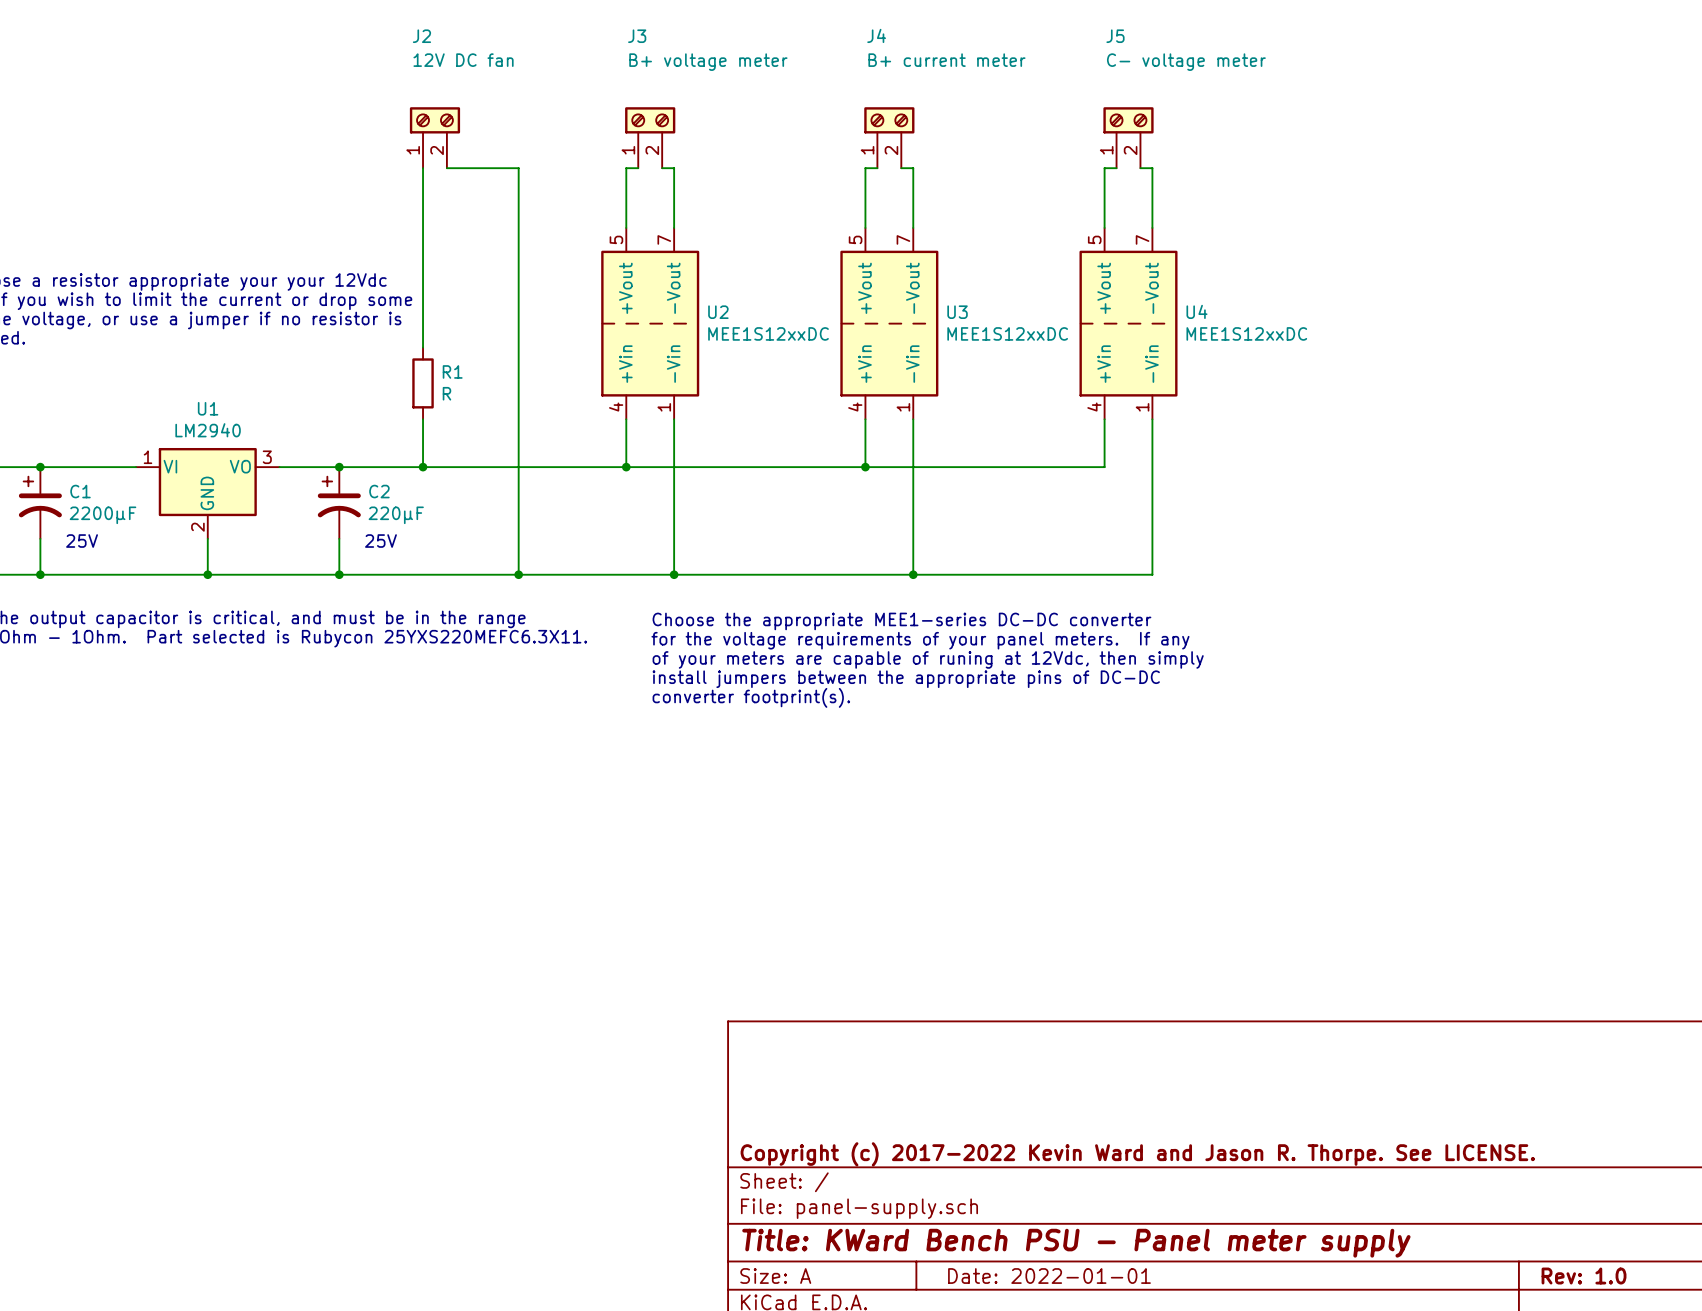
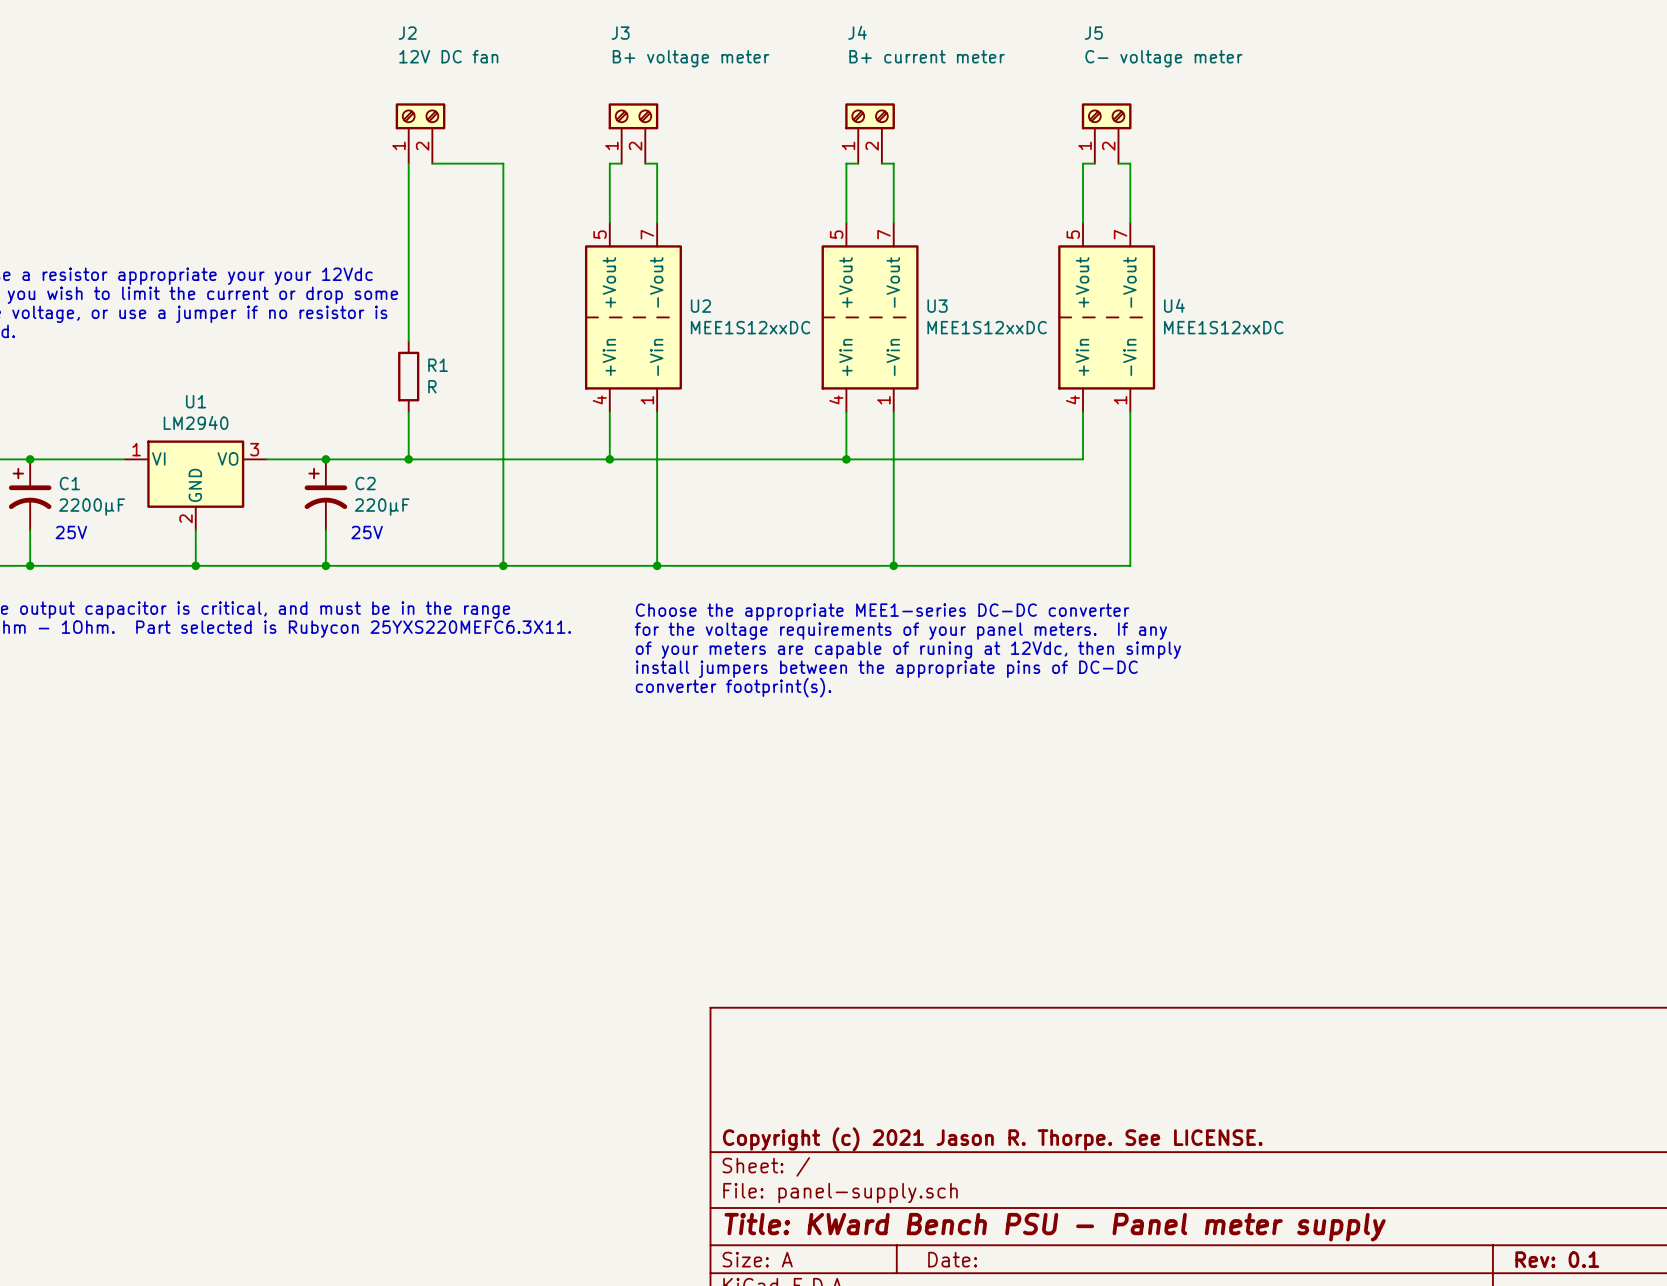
title block: Copyright (c) 2017-2022 Kevin Ward and Jason R. Thorpe. See LICENSE. (1137, 1154) -> Copyright (c) 2021 Jason R. Thorpe. See LICENSE. (992, 1139)
title block: Date: 2022-01-01 (1049, 1276) -> Date: (952, 1259)
title block: Rev: 1.0 (1584, 1276) -> Rev: 0.1 (1557, 1259)

